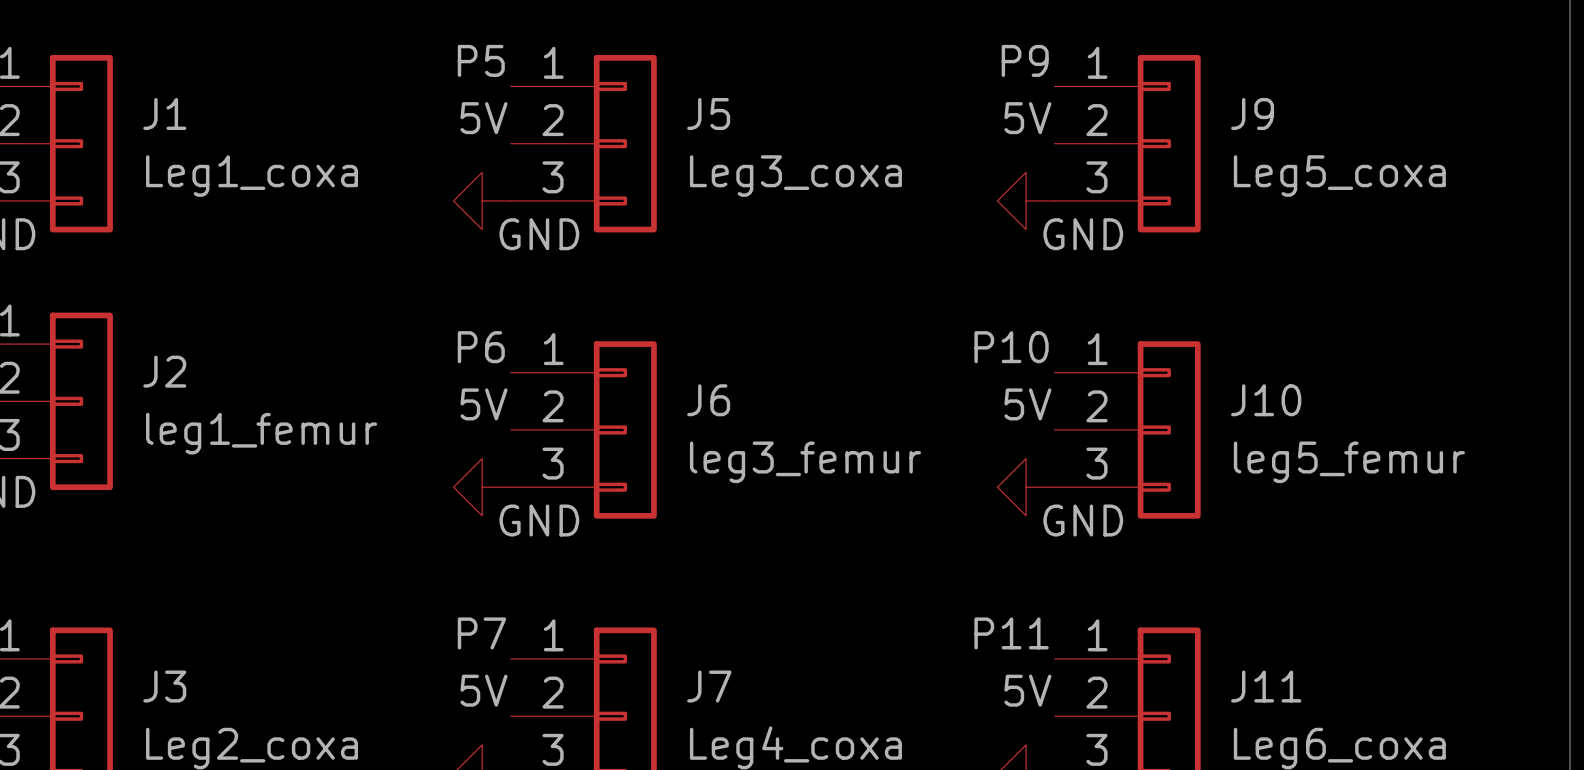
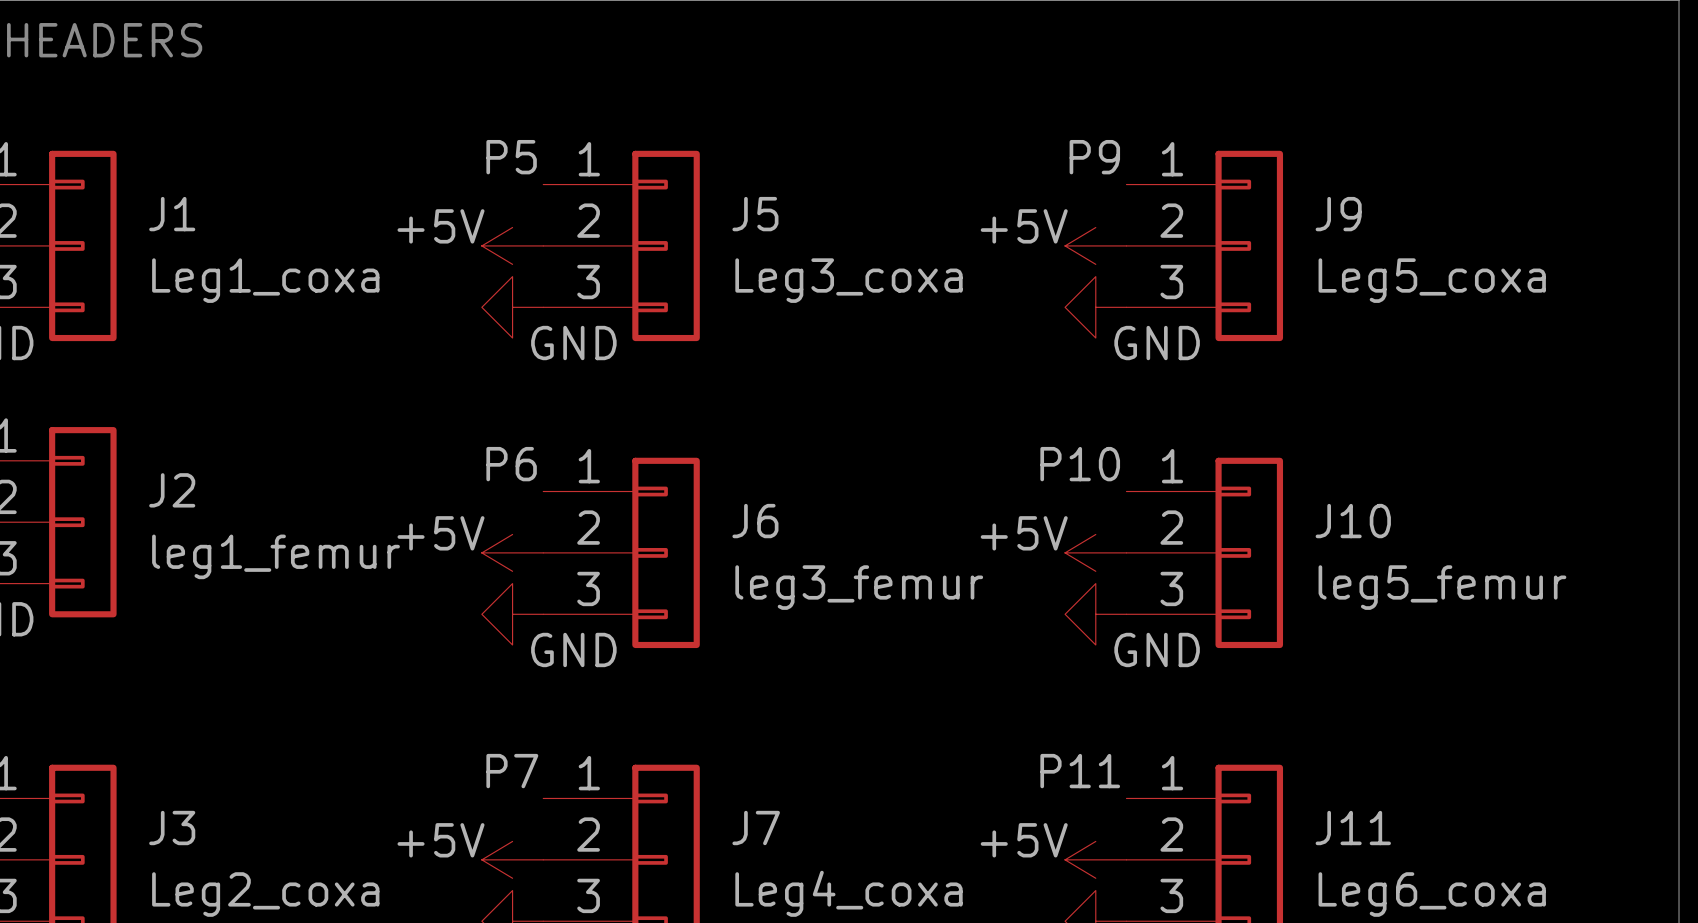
label: 5V (484, 118) -> none
label: 5V (1027, 118) -> none
power symbol: none -> +5V (512, 245)
power symbol: none -> +5V (1095, 245)
label: 5V (484, 404) -> none
label: 5V (1027, 404) -> none
power symbol: none -> +5V (512, 552)
power symbol: none -> +5V (1095, 552)
label: 5V (484, 690) -> none
label: 5V (1027, 690) -> none
power symbol: none -> +5V (512, 859)
power symbol: none -> +5V (1095, 859)

